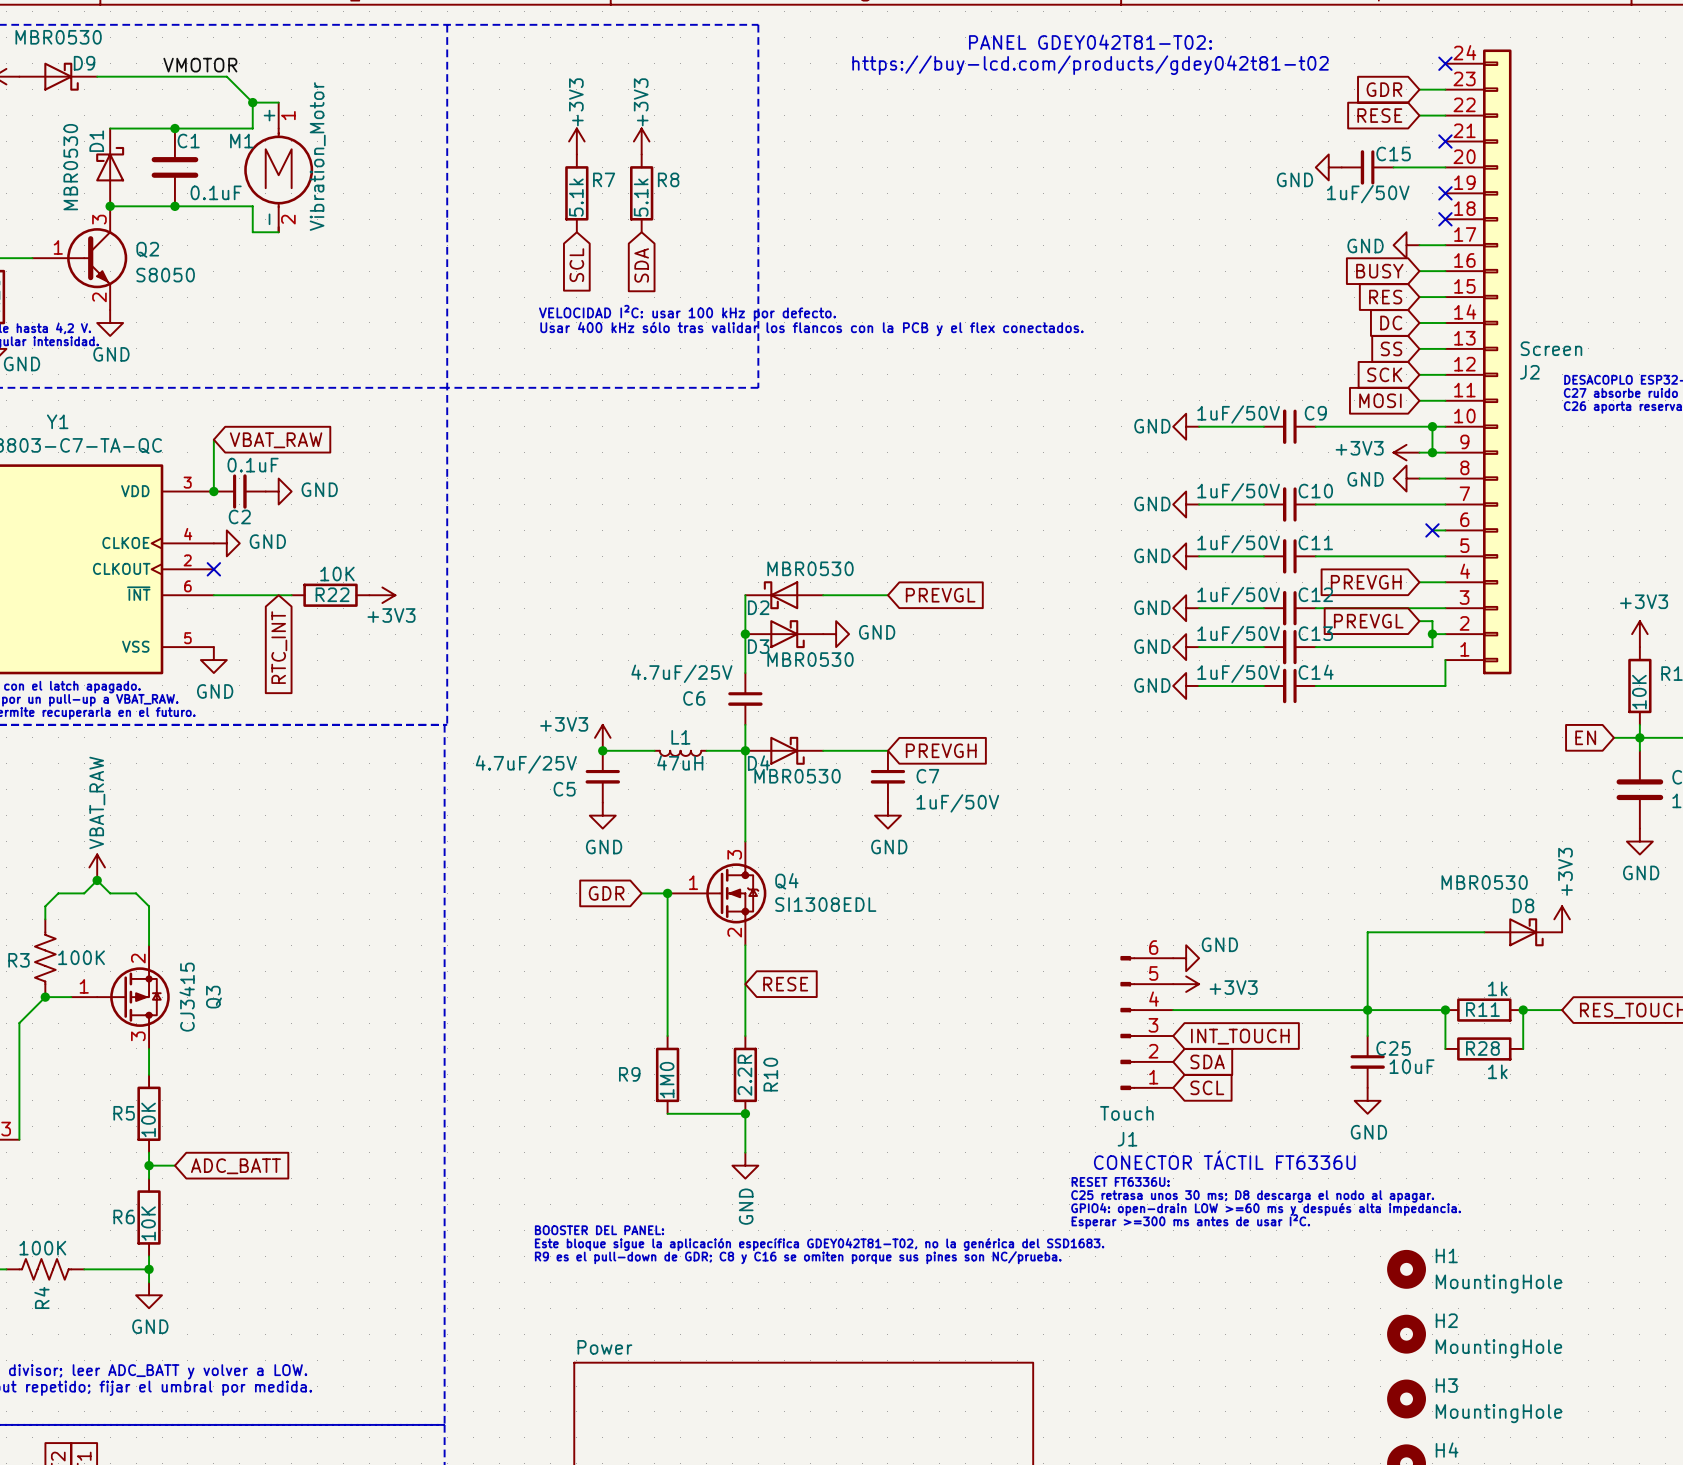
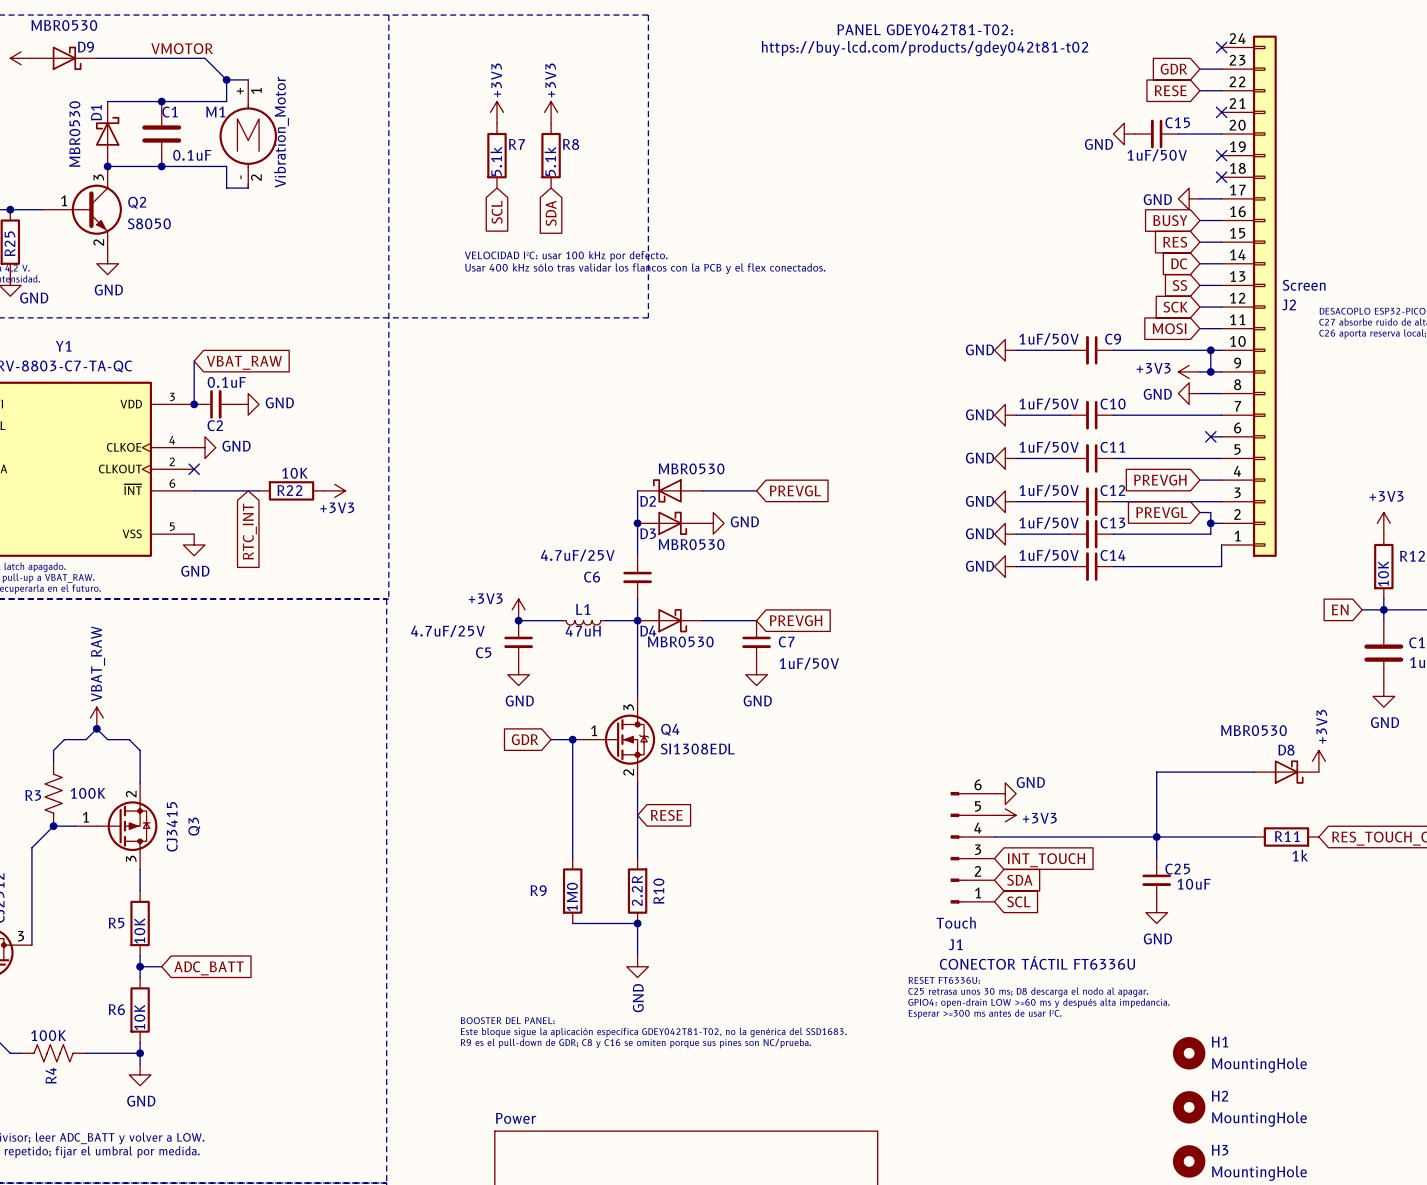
R11 value position: 1k (1497, 988) -> 1k (1300, 855)
wire: (1445, 1010) (1445, 1048) -> (1221, 836) (1254, 836)
junction: (1445, 1010) -> none
R11 position: (1484, 1010) -> (1286, 836)
junction: (1523, 1010) -> none
wire: (1562, 1010) (1523, 1010) (1523, 1048) -> none
R28: 1k (1484, 1048) -> none

